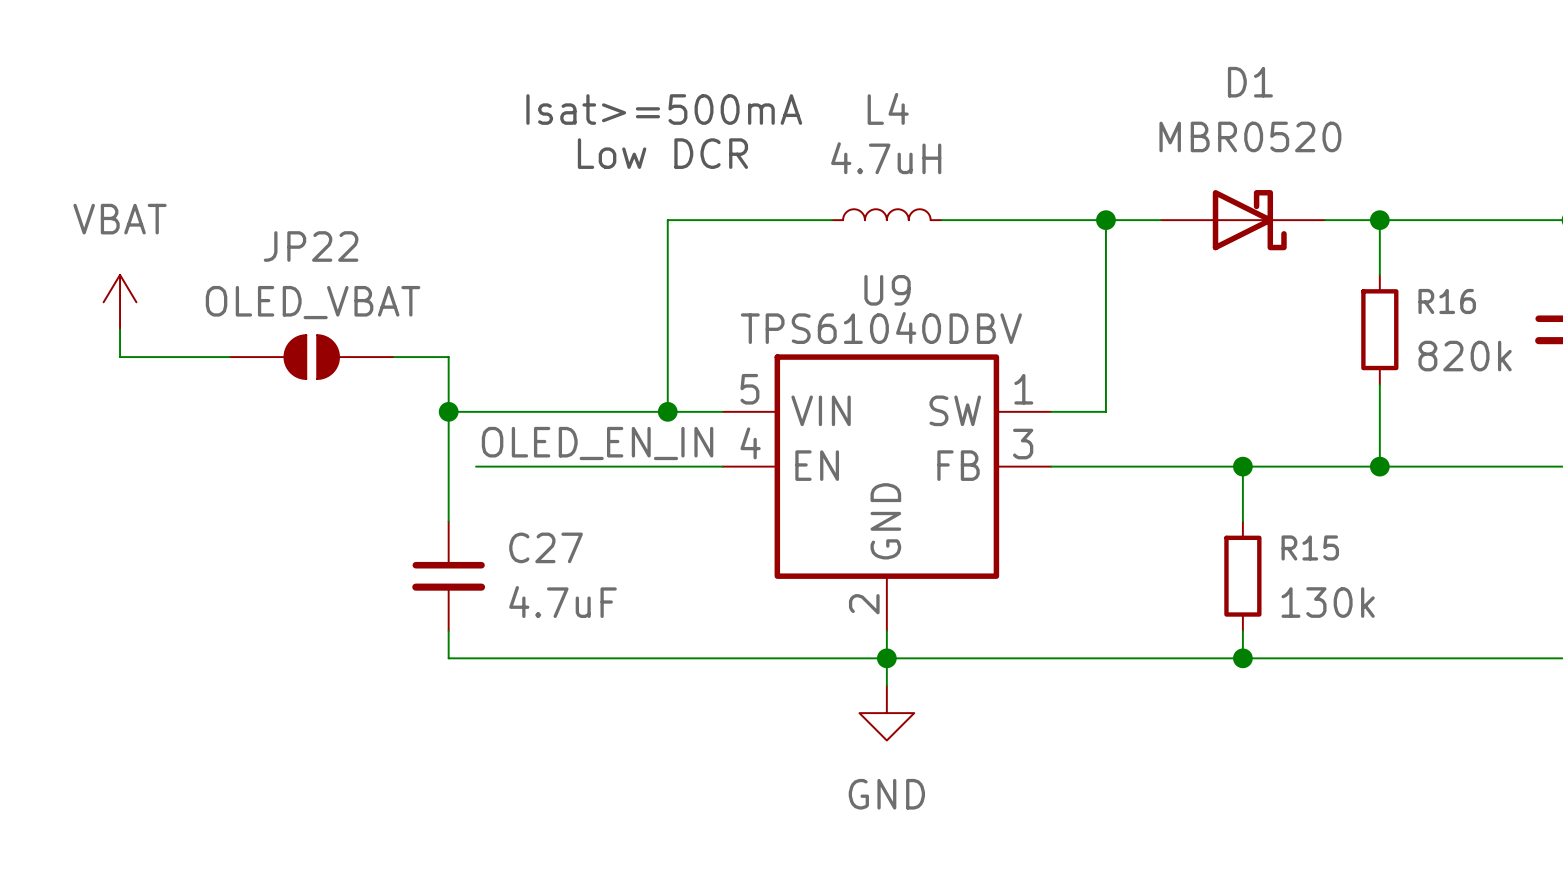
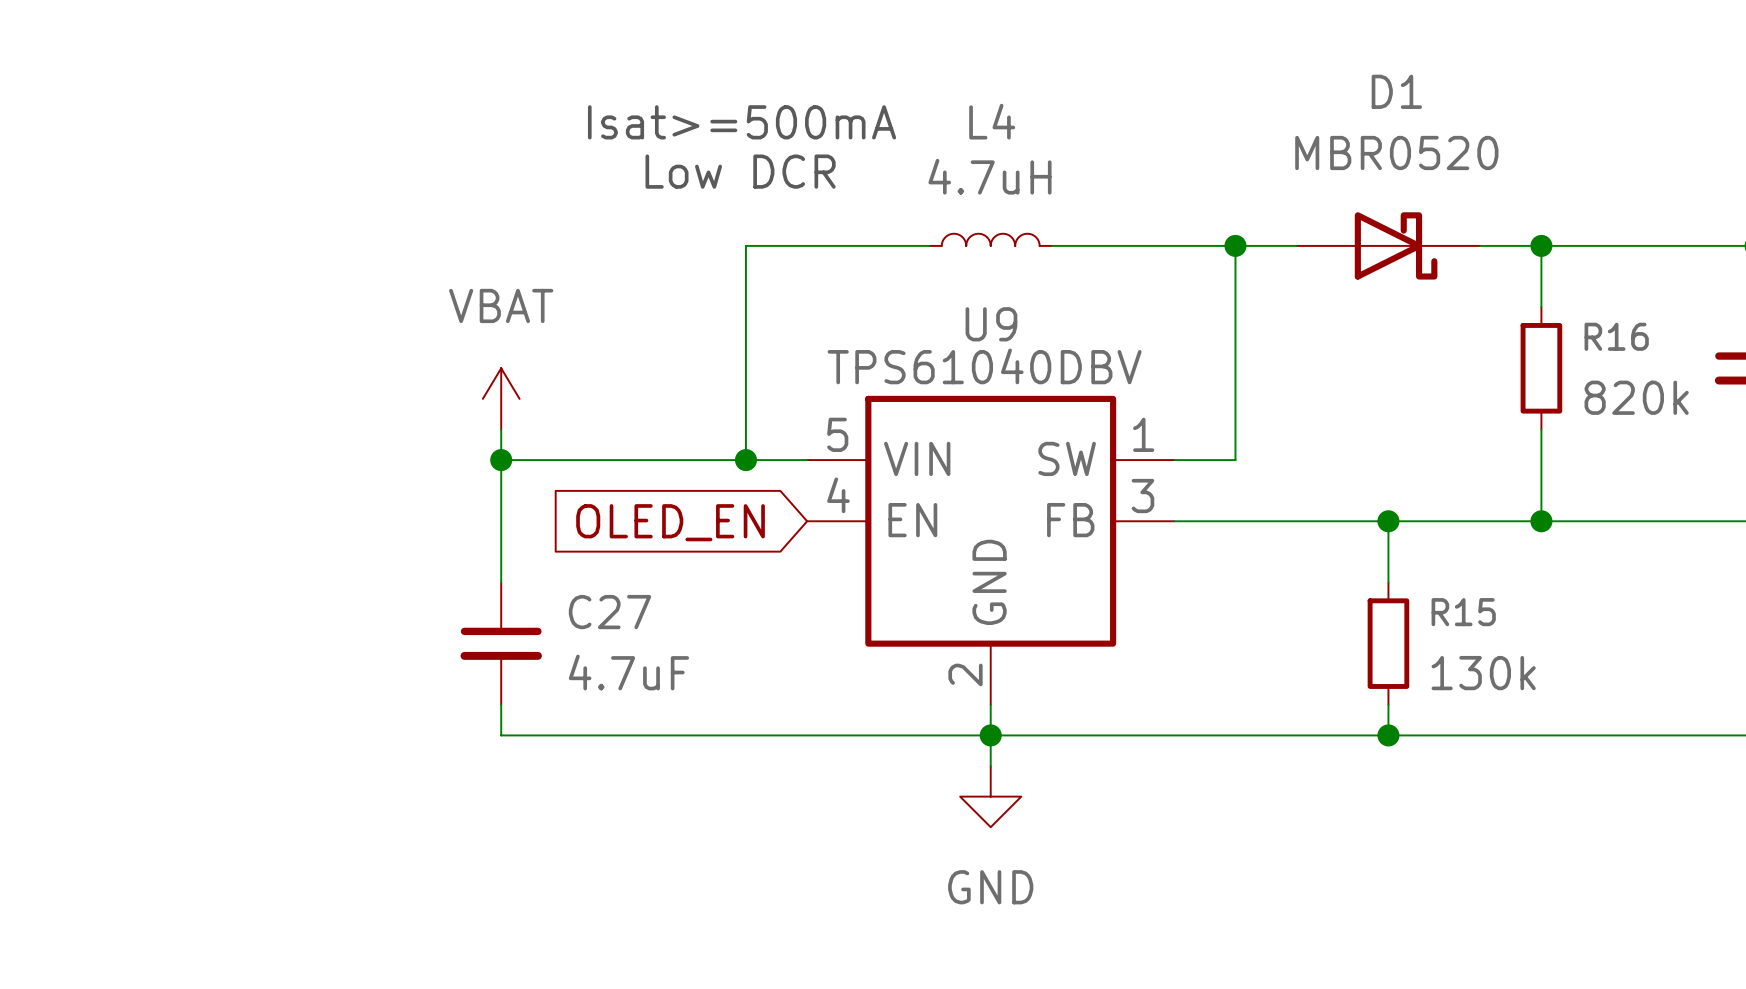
power symbol position: VBAT (120, 302) -> VBAT (501, 398)
wire: (120, 329) (120, 357) (229, 357) -> none
JP22: OLED_VBAT (311, 357) -> none
wire: (393, 357) (448, 357) (448, 384) -> none
label: OLED_EN_IN (597, 443) -> none
wire: (476, 466) (722, 466) -> none
global label: none -> OLED_EN (670, 522)

